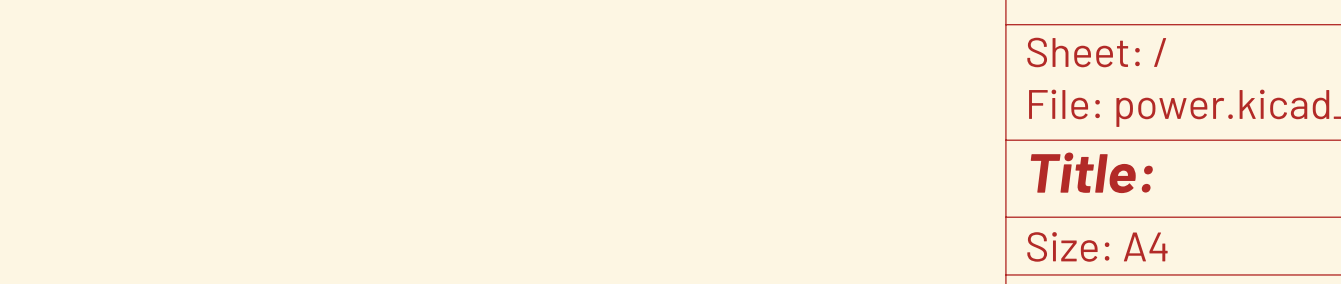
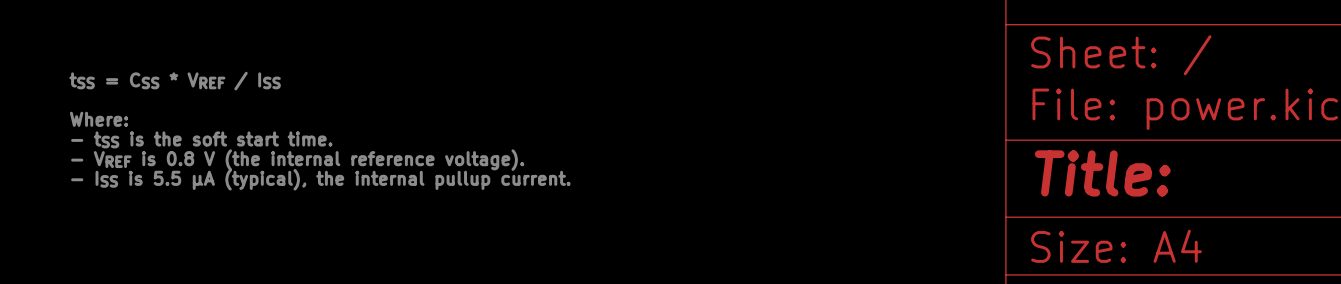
text: none -> tSS = CSS * VREF / ISS (175, 81)
text: none -> Where: (99, 119)
text: none -> - tSS is the soft start time. (201, 139)
text: none -> - VREF is 0.8 V (the internal reference voltage). (297, 160)
text: none -> - ISS is 5.5 μA (typical), the internal pullup current. (320, 179)

